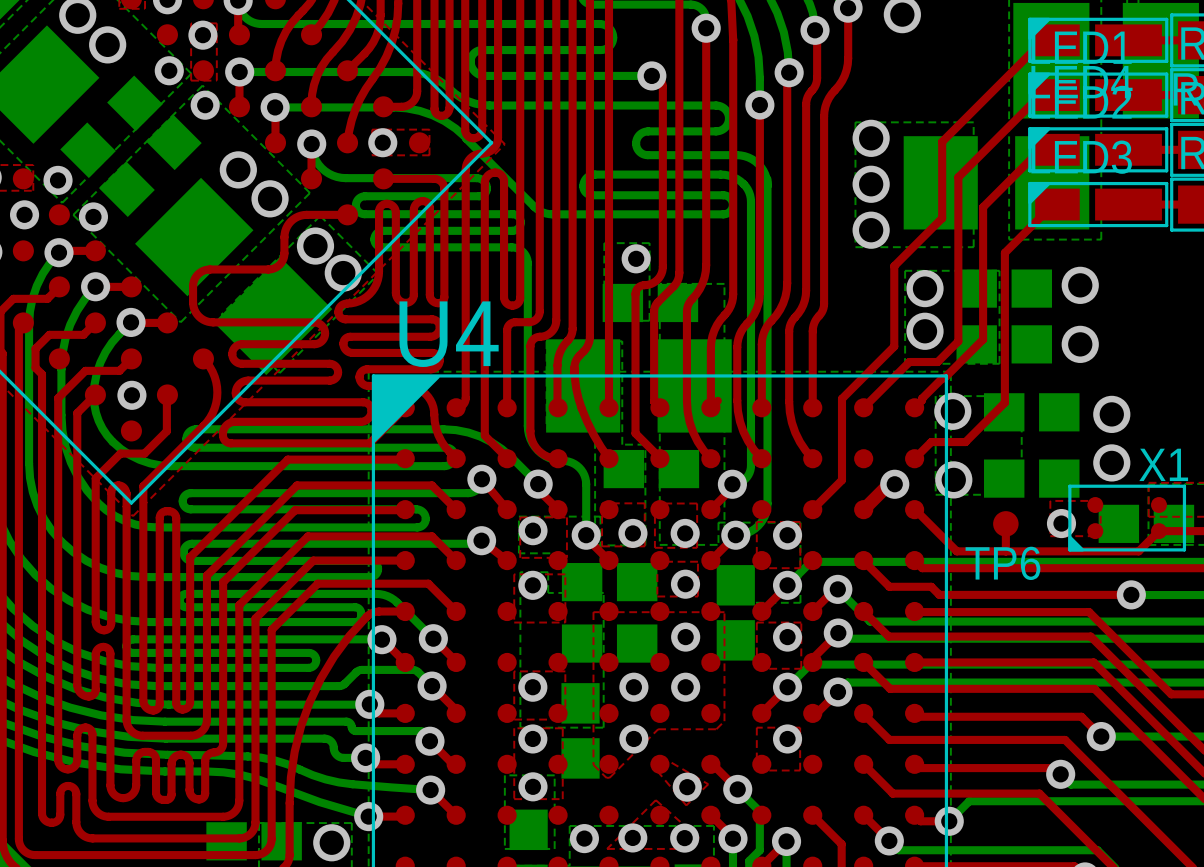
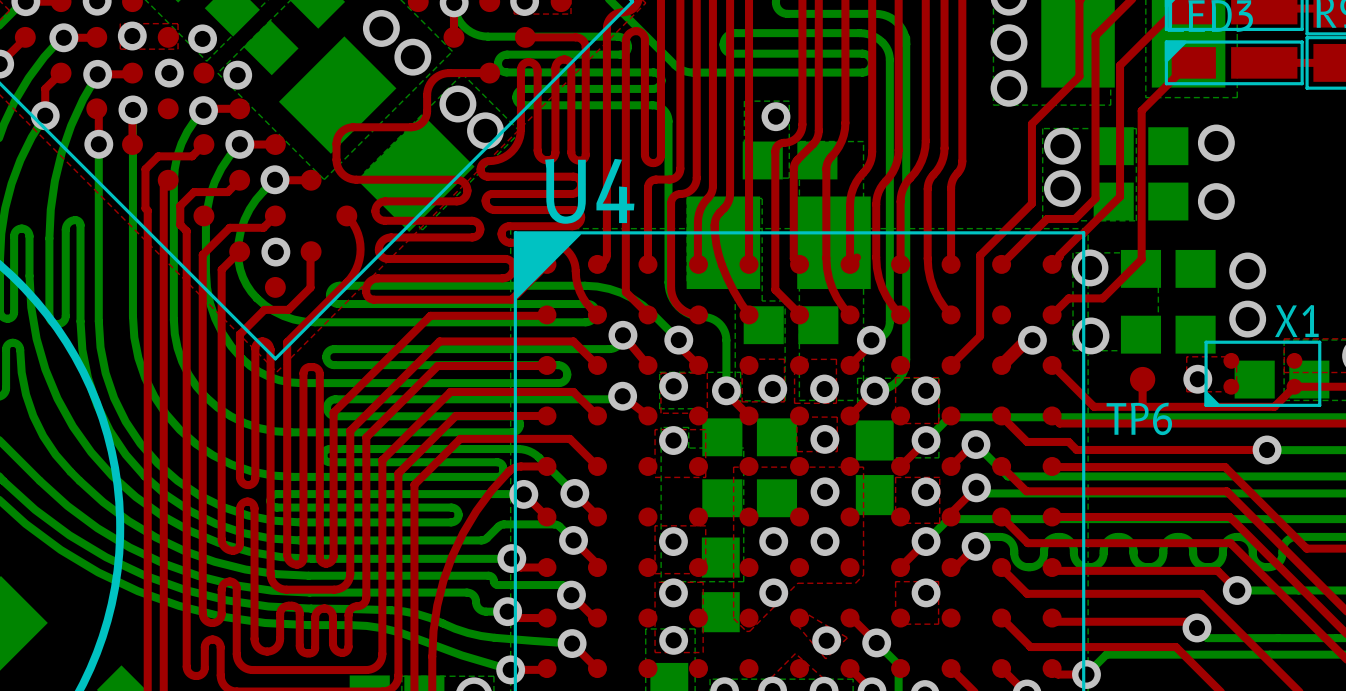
bottom track: (862, 682) (920, 682) -> (1000, 536) (1010, 541) (1017, 561) (1028, 567) (1039, 563) (1046, 542) (1058, 536)
bottom track: (922, 682) (980, 682) -> (1059, 536) (1070, 542) (1077, 563) (1087, 567) (1099, 563) (1106, 542) (1117, 536)
bottom track: (982, 682) (1040, 682) -> (1119, 536) (1130, 542) (1137, 563) (1147, 567) (1159, 563) (1166, 542) (1177, 536)
bottom track: (1042, 682) (1100, 682) -> (1179, 536) (1189, 541) (1196, 561) (1207, 567) (1218, 563) (1225, 542) (1236, 536)
bottom track: (1102, 682) (1161, 682) -> (1238, 536) (1248, 541) (1255, 561) (1266, 567) (1278, 563) (1285, 542) (1296, 536)

